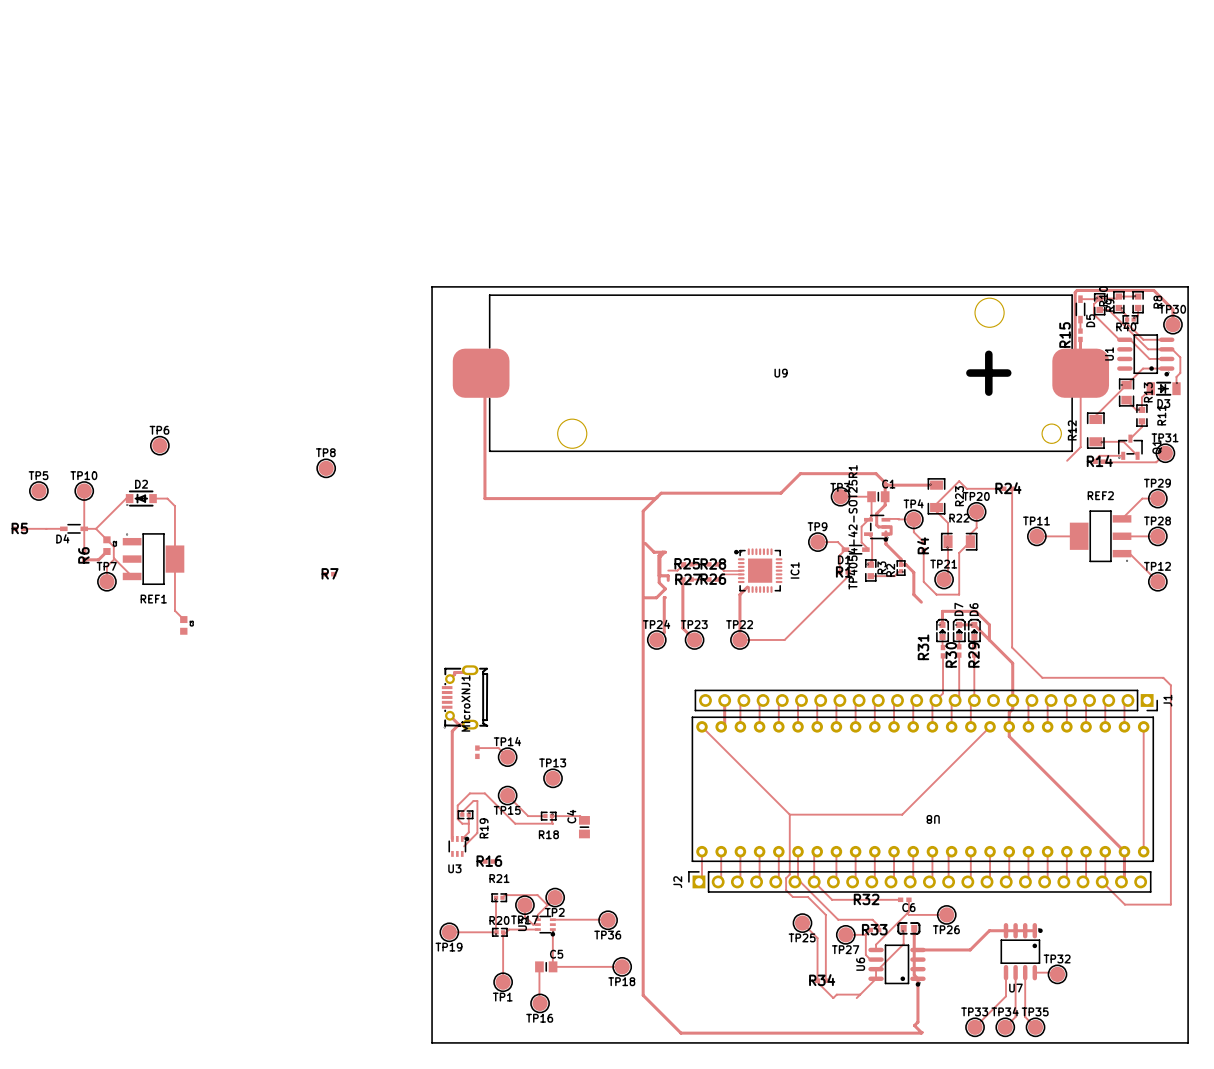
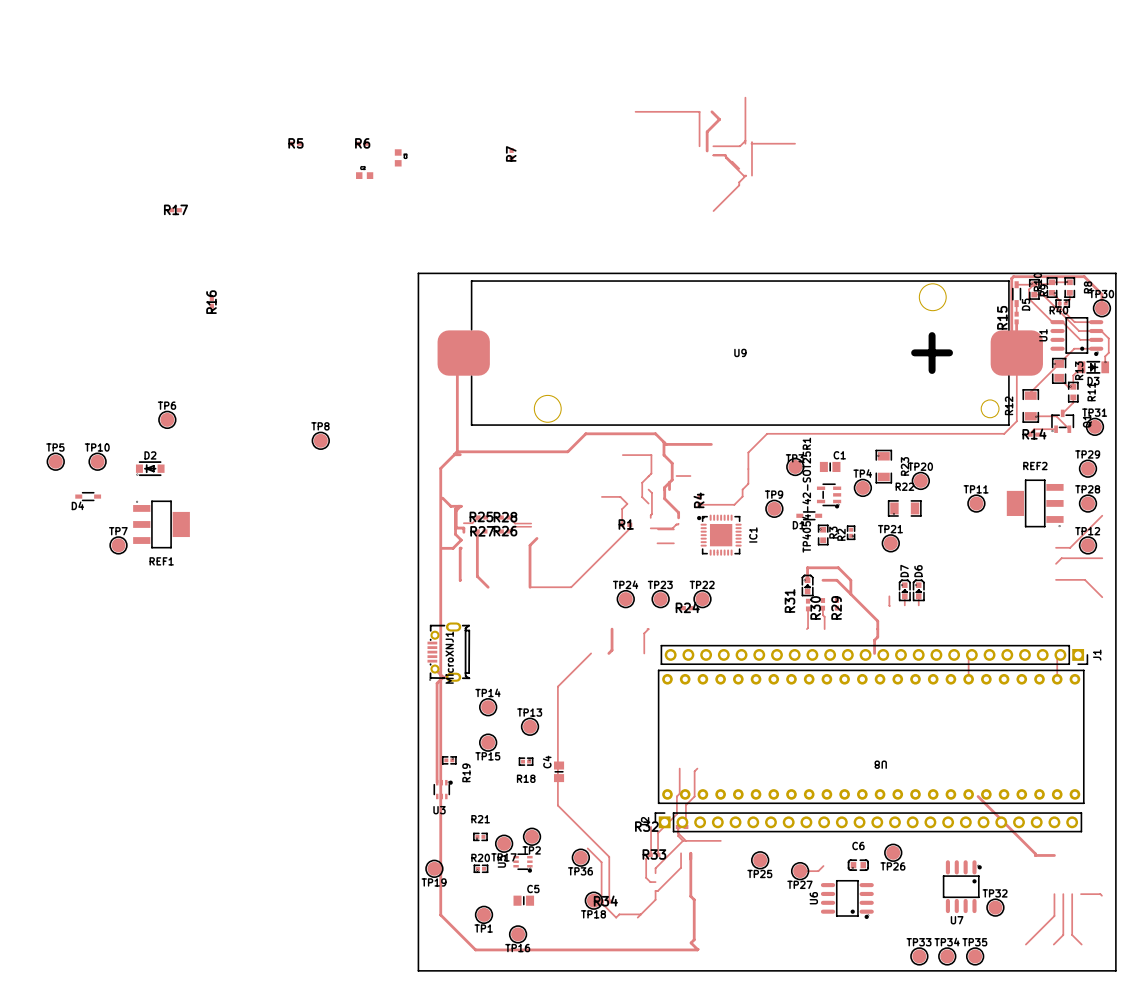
track: none -> (745, 97) (745, 143)
track: none -> (635, 111) (699, 111) (699, 146)
track: none -> (711, 111) (719, 119) (707, 131) (707, 150)
track: none -> (745, 140) (740, 146) (713, 146)
track: none -> (751, 142) (751, 175)
track: none -> (751, 143) (795, 143)
track: none -> (713, 155) (725, 155) (725, 157) (743, 175) (746, 175)
track: none -> (724, 155) (739, 168)
track: none -> (745, 175) (739, 182) (739, 185) (713, 211)
R17: none -> (175, 210)
track: none -> (457, 353) (457, 451)
track: (481, 373) (484, 377) (484, 498) (655, 498) -> none
track: (1165, 453) (1156, 462) (1103, 461) -> none
track: none -> (1004, 433) (767, 433) (748, 452) (748, 483) (742, 489) (742, 496) (734, 504) (699, 504)
track: none -> (663, 442) (663, 455) (672, 463) (672, 479) (664, 487) (664, 498) (678, 512) (678, 517)
track: none -> (711, 444) (666, 444) (655, 433) (585, 433) (567, 451) (457, 451)
track: none -> (457, 451) (440, 468) (440, 915) (475, 949) (697, 949) (691, 942) (694, 939) (694, 899) (690, 896) (690, 853)
track: (885, 482) (885, 505) (876, 513) (876, 525) (885, 526) -> none
track: none -> (454, 454) (460, 454)
track: (936, 485) (887, 485) (876, 473) (800, 473) (780, 493) (661, 493) (643, 511) (643, 995) (680, 1033) (921, 1033) (914, 1025) (917, 1022) (917, 978) (914, 975) (914, 928) -> none
R24 position: (1007, 488) -> (687, 608)
track: (1012, 488) (1012, 647) (1042, 677) (1163, 677) (1170, 685) (1170, 904) (1124, 904) (1102, 881) (1105, 878) (1105, 851) -> none
track: (1003, 489) (966, 488) (959, 481) (936, 503) (936, 511) (948, 522) (948, 575) (944, 579) -> none
track: (84, 491) (84, 551) -> none
track: (840, 496) (871, 496) (871, 516) (861, 526) (861, 542) (868, 549) -> (622, 455) (651, 455) (651, 473) (642, 482) (642, 497) (648, 503)
track: (129, 498) (126, 498) (95, 528) -> none
track: (153, 498) (167, 498) (174, 506) (174, 610) (183, 619) -> none
track: (1157, 498) (1142, 498) (1122, 518) -> none
track: none -> (676, 476) (690, 476)
track: (976, 511) (976, 527) (970, 534) (970, 541) (959, 552) (959, 594) (936, 594) (923, 581) (923, 550) -> none
track: (885, 519) (913, 519) (913, 532) (923, 542) -> none
track: (891, 526) (891, 534) -> (669, 482) (669, 489)
R5 position: (19, 528) -> (295, 143)
track: (23, 528) (63, 528) -> none
track: (84, 528) (95, 528) -> none
track: (95, 528) (113, 546) (113, 558) (132, 576) -> none
track: (885, 531) (885, 544) (901, 559) (901, 564) (906, 564) (913, 572) (913, 594) (921, 602) -> none
track: (868, 534) (872, 537) (870, 564) -> (648, 489) (651, 492) (650, 517)
track: (1079, 536) (1036, 536) -> none
track: (1122, 536) (1157, 536) -> none
track: (817, 542) (837, 542) (845, 549) (839, 555) (839, 572) -> (601, 496) (620, 496) (627, 503) (622, 509) (622, 524)
track: (645, 543) (654, 552) (665, 552) (660, 557) (660, 574) (668, 575) -> (442, 498) (450, 506) (461, 506) (456, 510) (456, 527) (463, 527)
part rotation: 0° (106, 545) -> 90° clockwise (364, 175)
part position: (106, 545) -> (364, 175)
R4 position: (923, 546) -> (699, 500)
track: none -> (1102, 515) (1070, 547) (1056, 547)
track: (106, 551) (98, 559) (84, 559) -> none
track: (662, 552) (659, 555) (659, 582) (665, 588) (656, 597) (645, 597) -> (458, 506) (455, 509) (455, 534) (461, 540) (453, 548) (442, 548)
track: (1122, 553) (1129, 553) (1157, 581) -> none
R6 rotation: 0° (84, 555) -> 90° clockwise (362, 143)
R6 position: (84, 555) -> (362, 143)
track: (114, 559) (106, 566) (106, 581) -> none
track: (683, 564) (677, 570) (668, 570) -> (478, 517) (472, 523) (463, 523)
R27 position: (687, 564) -> (481, 517)
R28 position: (713, 564) -> (505, 517)
track: (717, 564) (723, 570) (741, 570) -> (509, 517) (515, 523) (531, 523)
track: (901, 571) (894, 576) (870, 576) -> (678, 523) (672, 528) (650, 528)
R1 position: (843, 572) -> (625, 524)
track: (848, 572) (848, 576) (784, 639) (739, 639) (739, 594) (747, 587) -> (629, 524) (629, 528) (571, 587) (530, 587) (530, 545) (536, 538)
R7 rotation: 0° (329, 574) -> 90° clockwise (511, 154)
R7 position: (329, 574) -> (511, 154)
track: (741, 574) (722, 574) (717, 579) -> (531, 526) (513, 526) (509, 531)
track: (659, 575) (668, 575) (668, 580) -> (455, 528) (463, 528) (463, 532)
track: (682, 579) (682, 628) (694, 639) -> (477, 531) (477, 576) (488, 587)
R25 position: (687, 579) -> (481, 531)
R26 position: (713, 579) -> (505, 531)
track: none -> (1102, 558) (1061, 558) (1056, 563)
track: (665, 597) (664, 632) -> (461, 548) (460, 580)
track: none -> (822, 580) (836, 580) (877, 621) (877, 637) (874, 640) (874, 653)
track: none -> (1056, 579) (1084, 579) (1102, 597)
track: (942, 624) (942, 611) (975, 611) (989, 624) (989, 639) -> (807, 580) (807, 567) (838, 567) (850, 580) (850, 594)
track: (959, 624) (974, 624) (1012, 663) (1012, 709) (1009, 712) (1009, 736) (1124, 851) (1124, 878) (1121, 881) -> none
part position: (183, 625) -> (398, 157)
part position: (942, 630) -> (807, 585)
track: none -> (822, 608) (824, 629)
track: none -> (808, 608) (806, 629)
R30 position: (959, 650) -> (822, 604)
R29 position: (974, 650) -> (836, 604)
R31 position: (943, 651) -> (808, 605)
track: (943, 655) (943, 693) (932, 703) (932, 726) -> none
track: (959, 655) (959, 696) (951, 703) (951, 726) -> none
track: (974, 655) (974, 700) (970, 703) (970, 726) -> none
track: (470, 670) (469, 672) (454, 672) (449, 679) -> none
track: none -> (591, 653) (557, 686) (557, 805) (609, 856) (609, 901)
track: (724, 700) (724, 723) (721, 726) -> (612, 629) (612, 650) (608, 653)
track: (743, 700) (740, 703) (740, 726) -> none
track: (763, 700) (759, 705) (759, 726) -> (647, 629) (644, 633) (644, 653)
track: (782, 700) (778, 703) (778, 726) -> none
track: (801, 700) (798, 703) (798, 726) -> none
track: (820, 700) (817, 703) (817, 726) -> none
track: (839, 700) (836, 703) (836, 726) -> none
track: (859, 700) (855, 703) (855, 726) -> none
track: (878, 700) (874, 703) (874, 726) -> none
track: (897, 700) (894, 703) (894, 726) -> none
track: (915, 700) (913, 703) (913, 726) -> none
track: (1051, 700) (1047, 703) (1047, 726) -> none
track: (1070, 700) (1066, 703) (1066, 726) -> none
track: (1089, 700) (1086, 703) (1086, 726) -> none
track: (1108, 700) (1105, 703) (1105, 726) -> none
track: (990, 726) (902, 814) (789, 814) -> none
track: (1143, 726) (1143, 851) -> none
track: (702, 730) (701, 726) (789, 814) -> none
track: (477, 748) (498, 748) (507, 757) -> none
part: (477, 752) -> none
track: (507, 795) (528, 816) (545, 816) -> none
track: (462, 814) (462, 812) (473, 801) (477, 801) (477, 833) (464, 846) -> none
track: (468, 814) (468, 832) (462, 838) -> none
track: (789, 814) (789, 874) (786, 878) (786, 890) (792, 897) (807, 897) (825, 914) (825, 980) -> none
track: (584, 820) (580, 816) (551, 816) (553, 823) (515, 823) (484, 793) (469, 793) (457, 805) (457, 819) (462, 823) (468, 823) -> none
track: none -> (679, 768) (679, 793) (676, 796) (676, 814) (658, 833) (658, 854)
track: none -> (697, 768) (694, 771) (694, 796) (685, 805) (685, 826)
track: (701, 851) (701, 878) (698, 881) -> none
track: (721, 851) (721, 878) (718, 881) -> none
track: (740, 851) (740, 878) (737, 881) -> none
track: (759, 851) (759, 878) (756, 881) -> none
track: (778, 851) (778, 878) (775, 881) -> none
track: (798, 851) (798, 878) (794, 881) (800, 881) (838, 919) (872, 919) (878, 925) (878, 930) -> none
track: (817, 851) (814, 854) (814, 881) -> none
track: (836, 851) (836, 878) (833, 881) -> none
track: (855, 851) (855, 878) (852, 881) -> none
track: (874, 851) (874, 878) (871, 881) -> none
track: (894, 851) (894, 878) (891, 881) -> none
track: (913, 851) (913, 878) (910, 881) -> none
track: (932, 851) (932, 878) (929, 881) -> none
track: (951, 851) (953, 851) (948, 856) (948, 881) -> none
track: (970, 851) (970, 878) (967, 881) -> none
track: (990, 851) (990, 878) (987, 881) -> none
track: (1009, 851) (1009, 878) (1006, 881) -> none
track: (1028, 851) (1028, 878) (1025, 881) -> none
track: (1047, 851) (1047, 878) (1044, 881) -> none
track: (1066, 851) (1066, 878) (1063, 881) -> none
track: (1086, 851) (1086, 878) (1083, 881) -> none
track: none -> (978, 796) (1035, 855) (1054, 855)
R16 rotation: 0° (489, 861) -> 90° clockwise (211, 302)
R16 position: (489, 861) -> (211, 302)
track: (814, 881) (832, 899) (900, 899) -> none
track: none -> (651, 826) (651, 854) (646, 859) (646, 877) (650, 882) (655, 882)
track: none -> (678, 826) (678, 836) (682, 840)
track: none -> (678, 833) (685, 840)
track: (496, 897) (496, 934) -> none
track: (502, 897) (505, 895) (537, 895) (547, 905) -> none
track: (555, 897) (537, 914) (537, 919) -> none
R32 position: (904, 899) -> (682, 826)
track: (908, 899) (908, 911) (876, 944) (876, 949) -> none
track: none -> (682, 840) (655, 868) (655, 873)
track: none -> (682, 840) (720, 840)
track: (524, 905) (524, 916) (533, 924) (537, 924) -> none
track: (907, 913) (908, 914) -> none
track: (908, 914) (946, 914) -> none
track: (552, 919) (608, 920) -> none
track: (802, 923) (817, 938) (817, 982) (833, 998) (836, 994) (860, 994) -> (587, 848) (601, 862) (601, 903) (616, 917) (619, 914) (640, 914)
track: (903, 928) (903, 944) (878, 969) (876, 969) (876, 978) (856, 998) -> (681, 853) (681, 867) (657, 890) (655, 890) (655, 899) (637, 917)
track: (537, 929) (508, 929) (503, 935) -> none
track: (552, 929) (553, 966) (622, 966) -> none
R33 position: (874, 930) -> (654, 854)
track: (1034, 930) (989, 930) (970, 949) (917, 949) -> none
track: (449, 932) (496, 932) -> none
track: (503, 932) (503, 982) -> none
track: (865, 934) (865, 955) (870, 959) (876, 959) -> none
track: (539, 966) (540, 1003) -> none
track: (1006, 972) (1006, 996) (975, 1027) -> (1054, 894) (1054, 915) (1025, 944)
track: (1015, 972) (1015, 1016) (1005, 1027) -> (1063, 894) (1063, 935) (1053, 944)
track: (1025, 972) (1025, 1016) (1035, 1027) -> (1072, 894) (1072, 935) (1081, 944)
track: (1034, 972) (1055, 972) (1057, 974) -> (1081, 894) (1101, 895)
R34 position: (821, 980) -> (605, 901)

